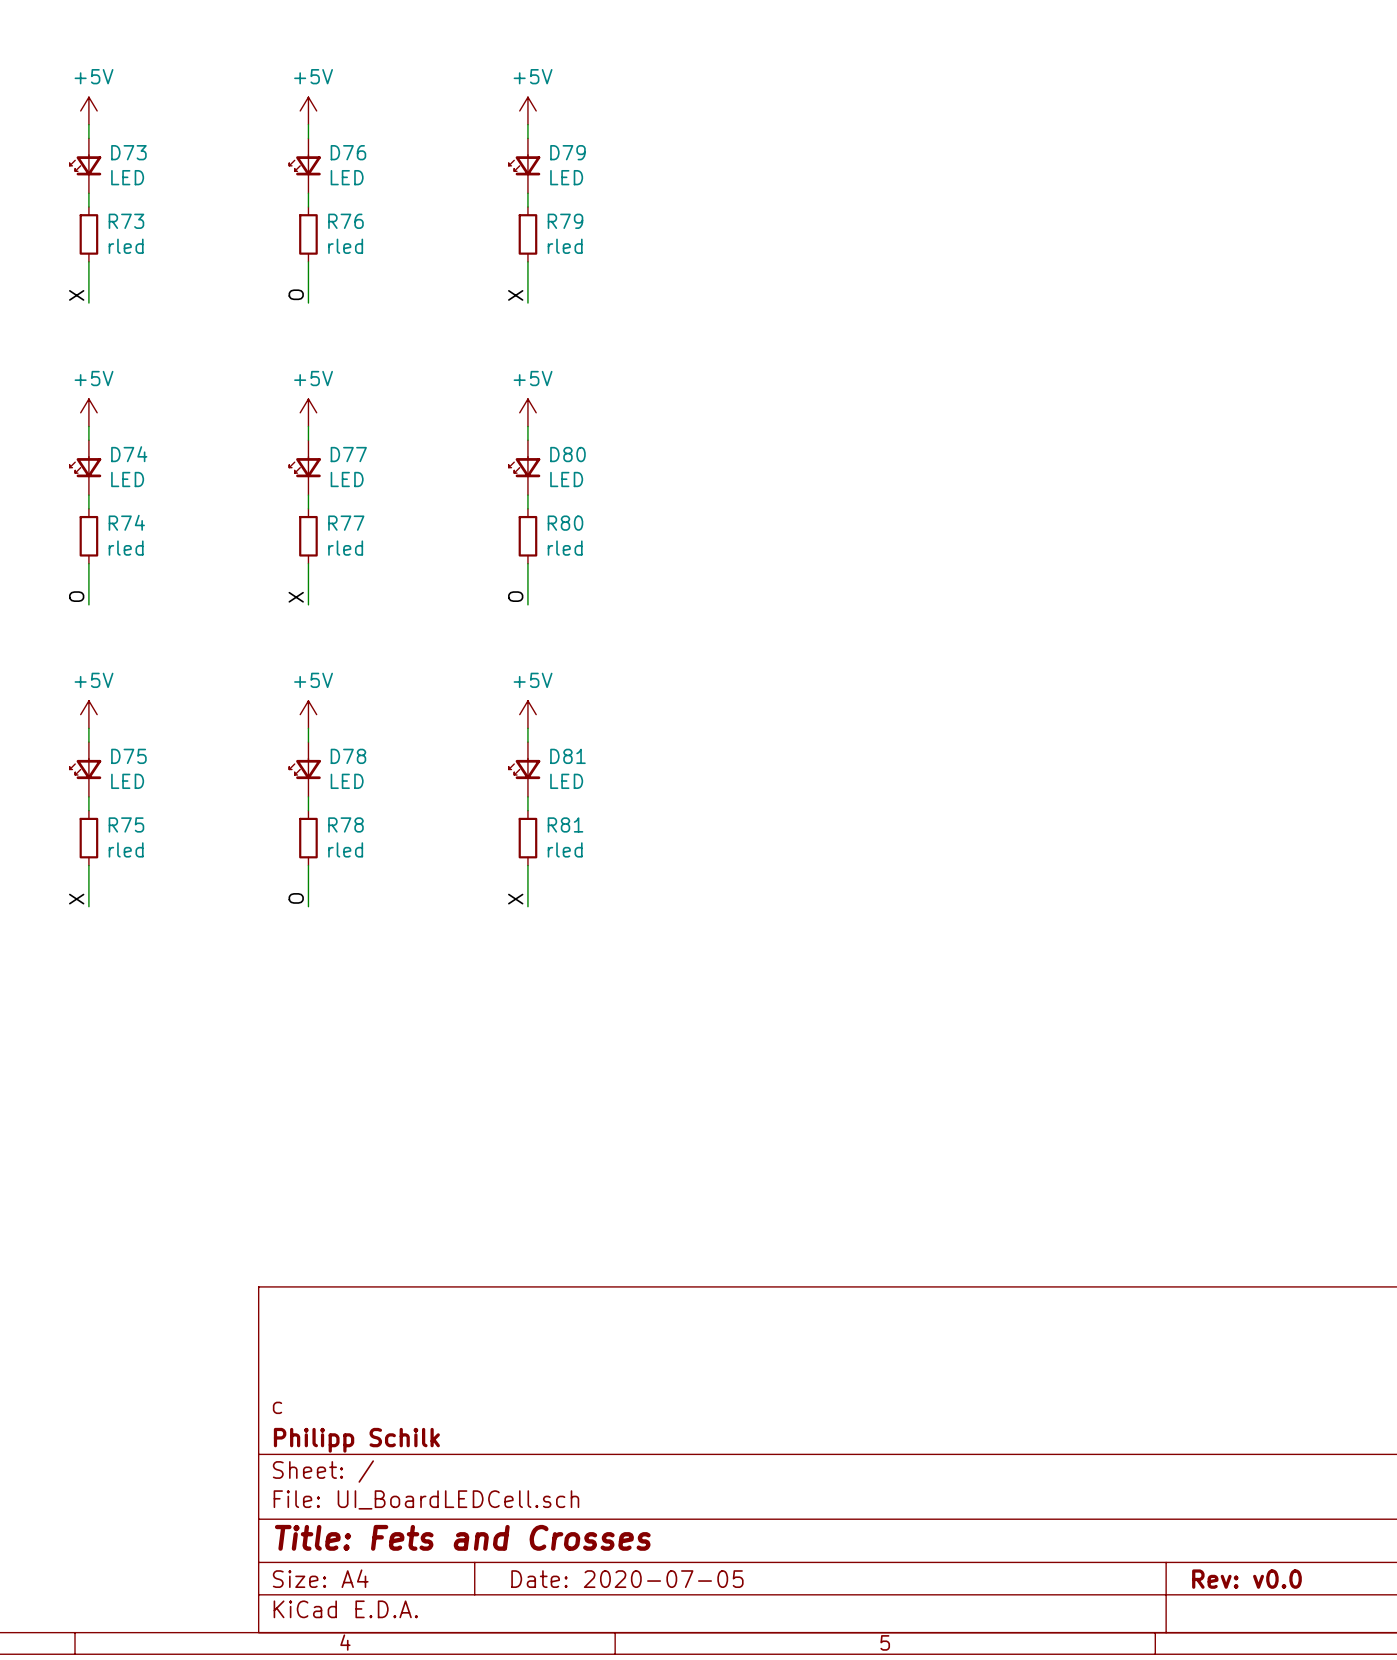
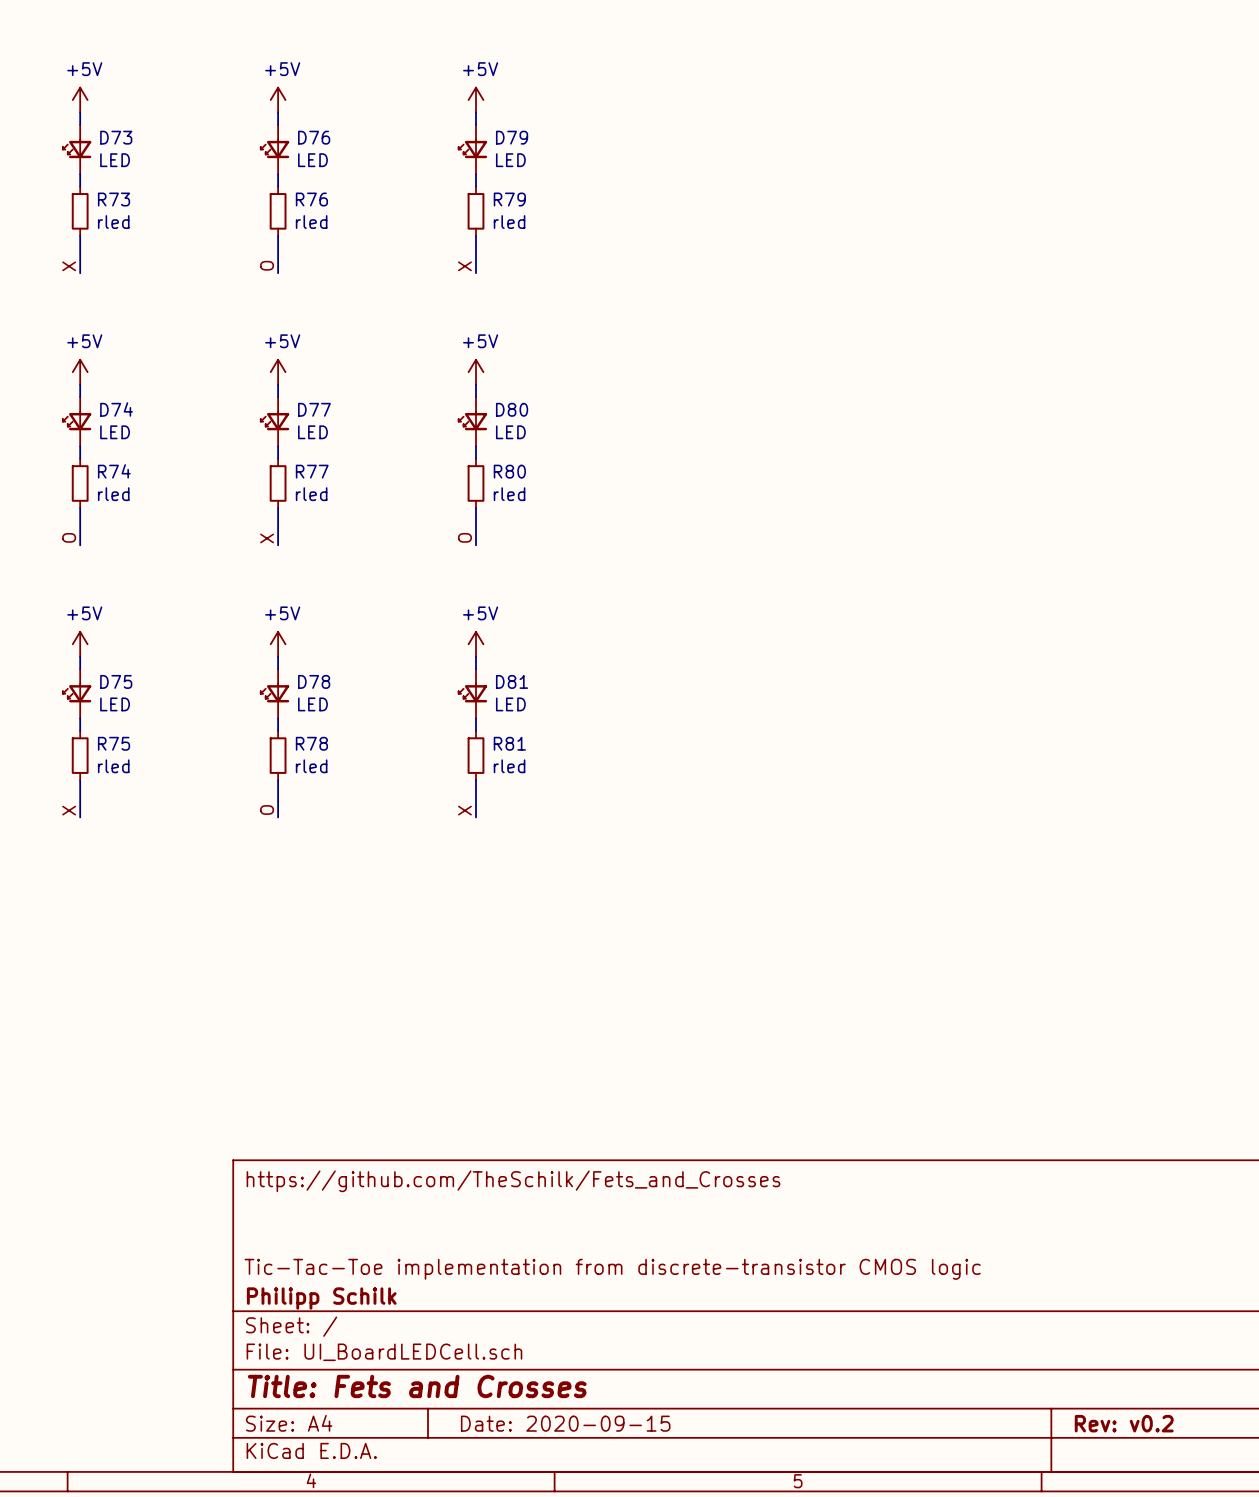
title block: none -> https://github.com/TheSchilk/Fets_and_Crosses (513, 1181)
title block: c (277, 1407) -> Tic-Tac-Toe implementation from discrete-transistor CMOS logic (612, 1269)
title block: Date: 2020-07-05 (627, 1579) -> Date: 2020-09-15 (565, 1423)
title block: Rev: v0.0 (1246, 1579) -> Rev: v0.2 (1124, 1423)

